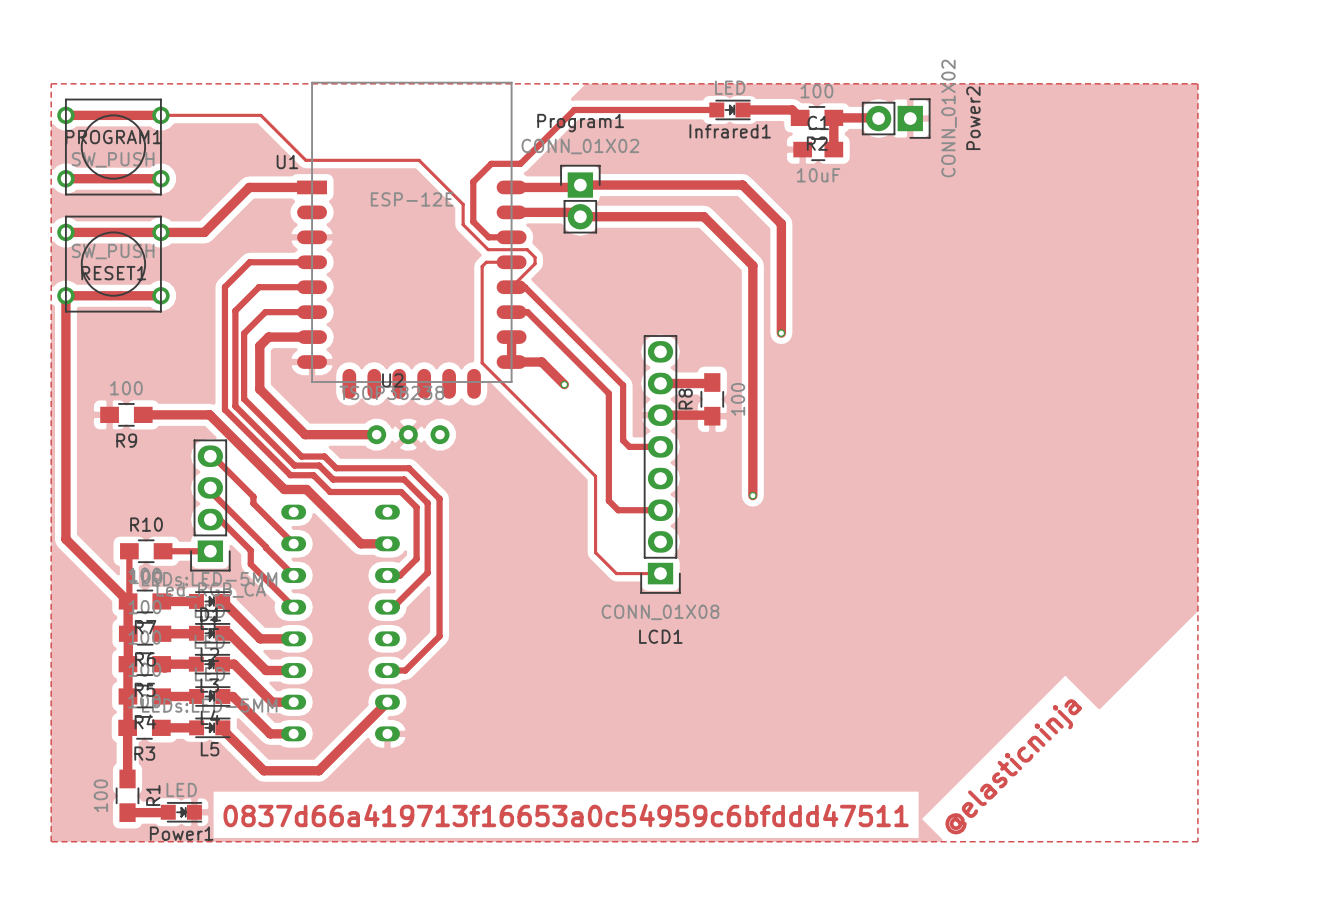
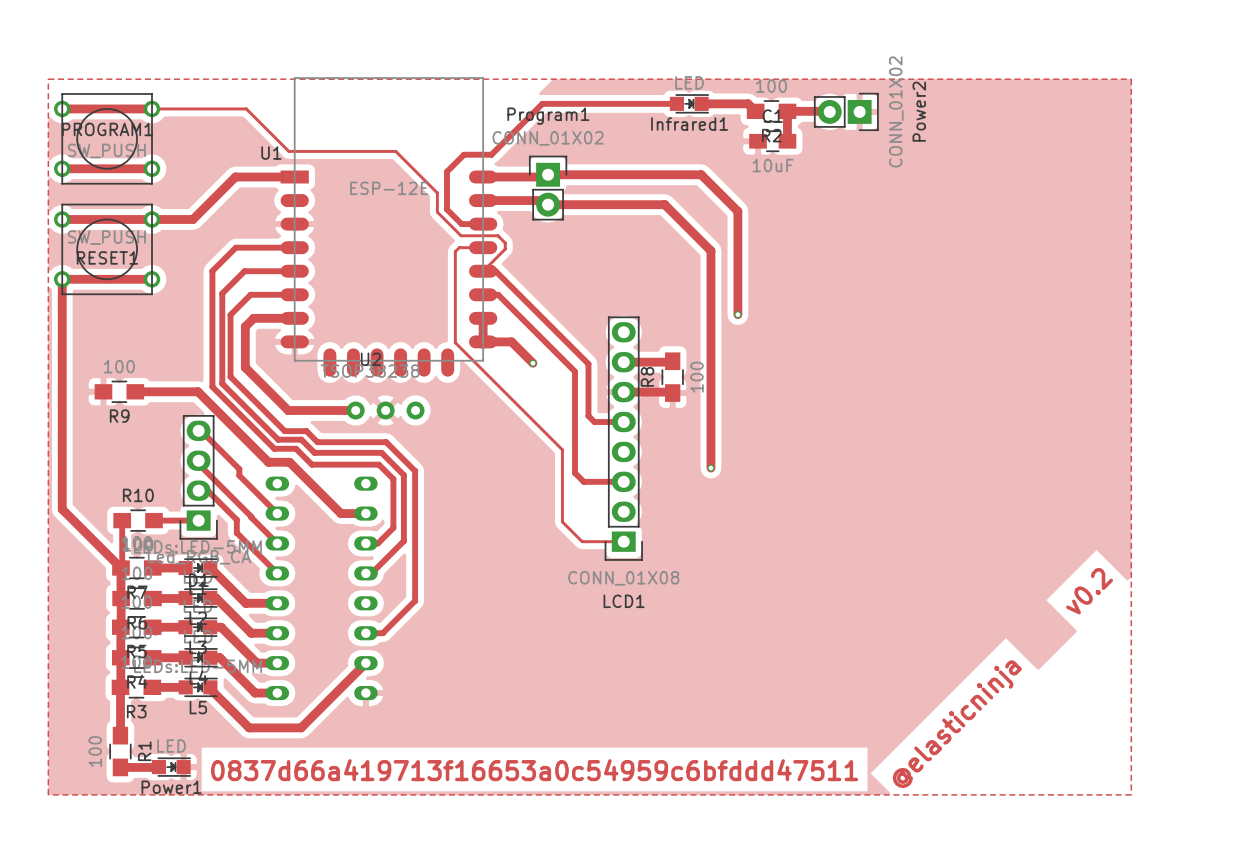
text: none -> v0.2 (1089, 591)

